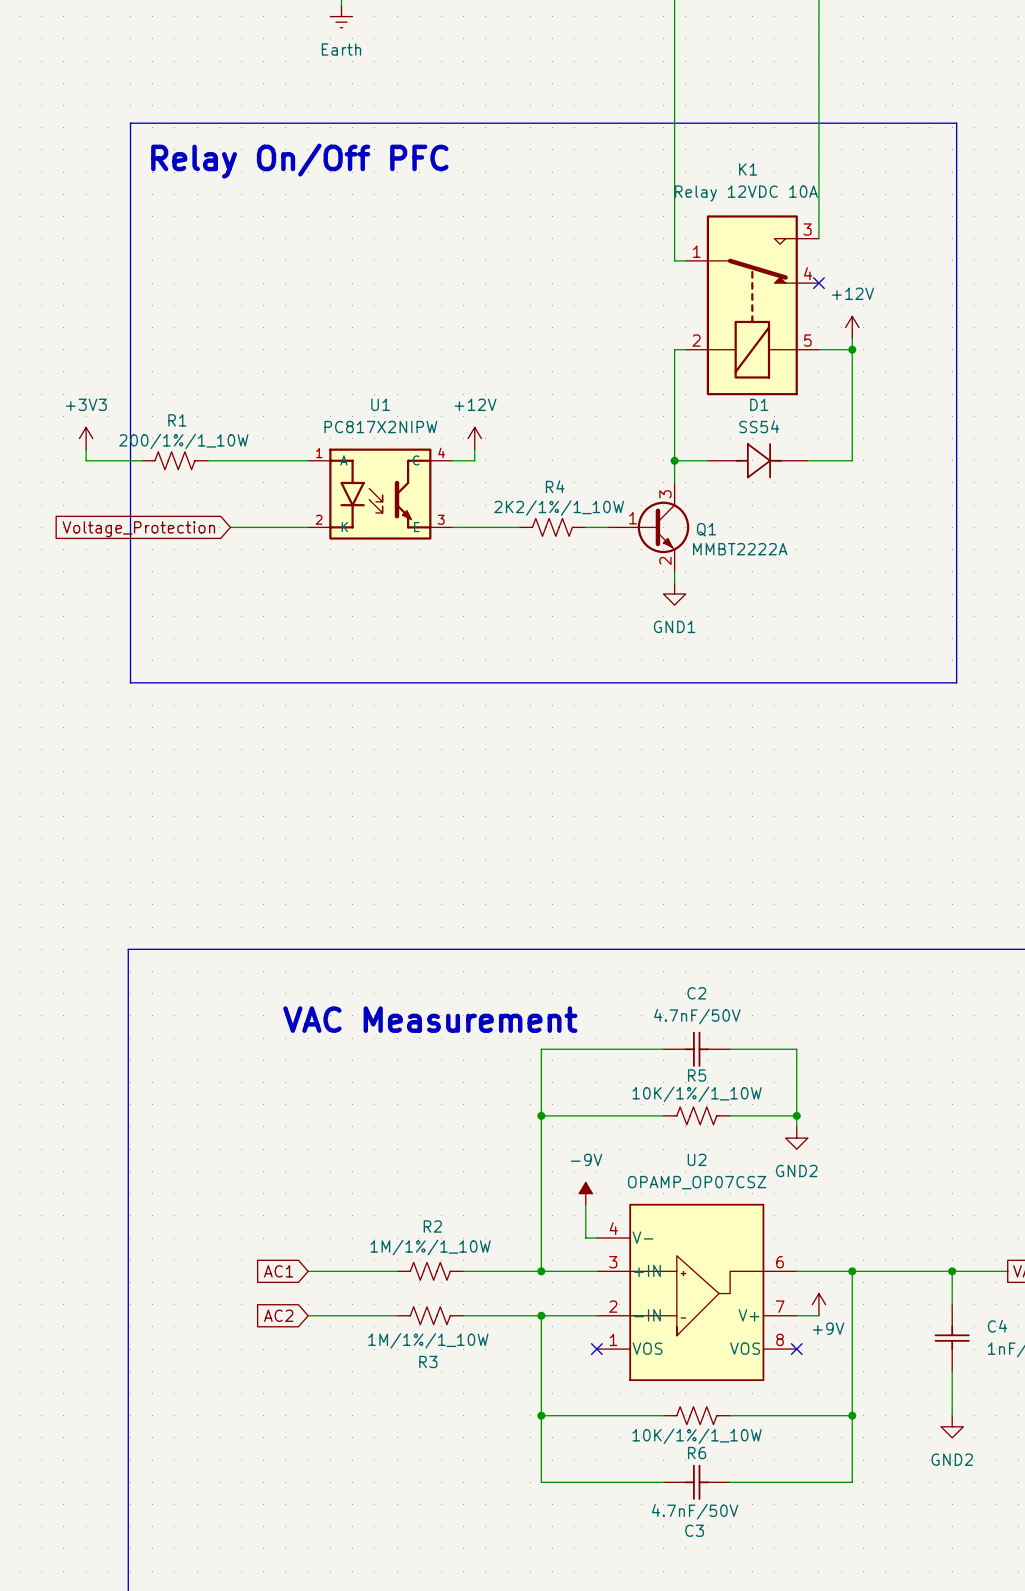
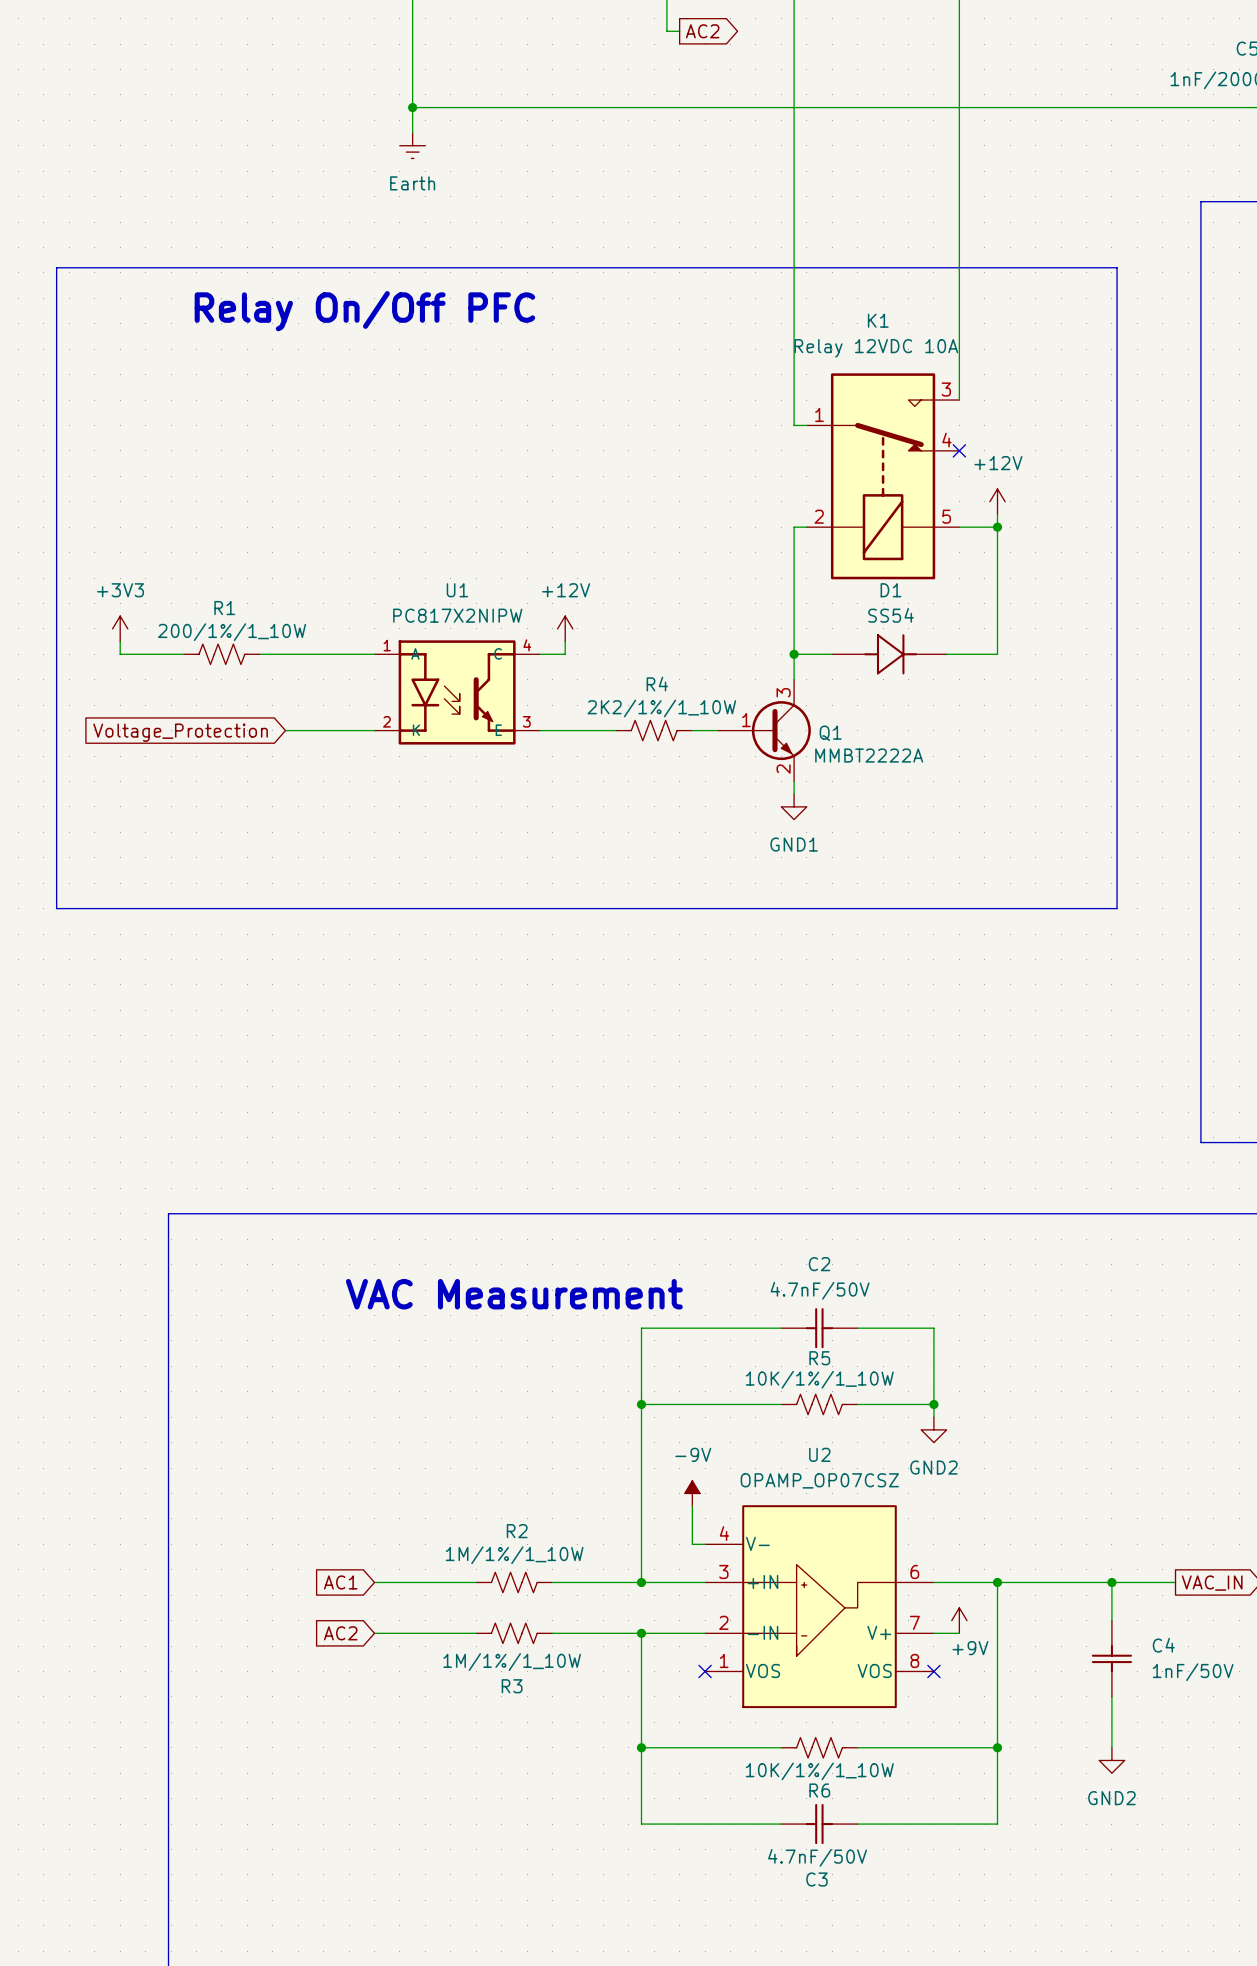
line: (130, 123) (130, 682) -> (171, 267) (56, 267) (56, 908) (171, 908)

